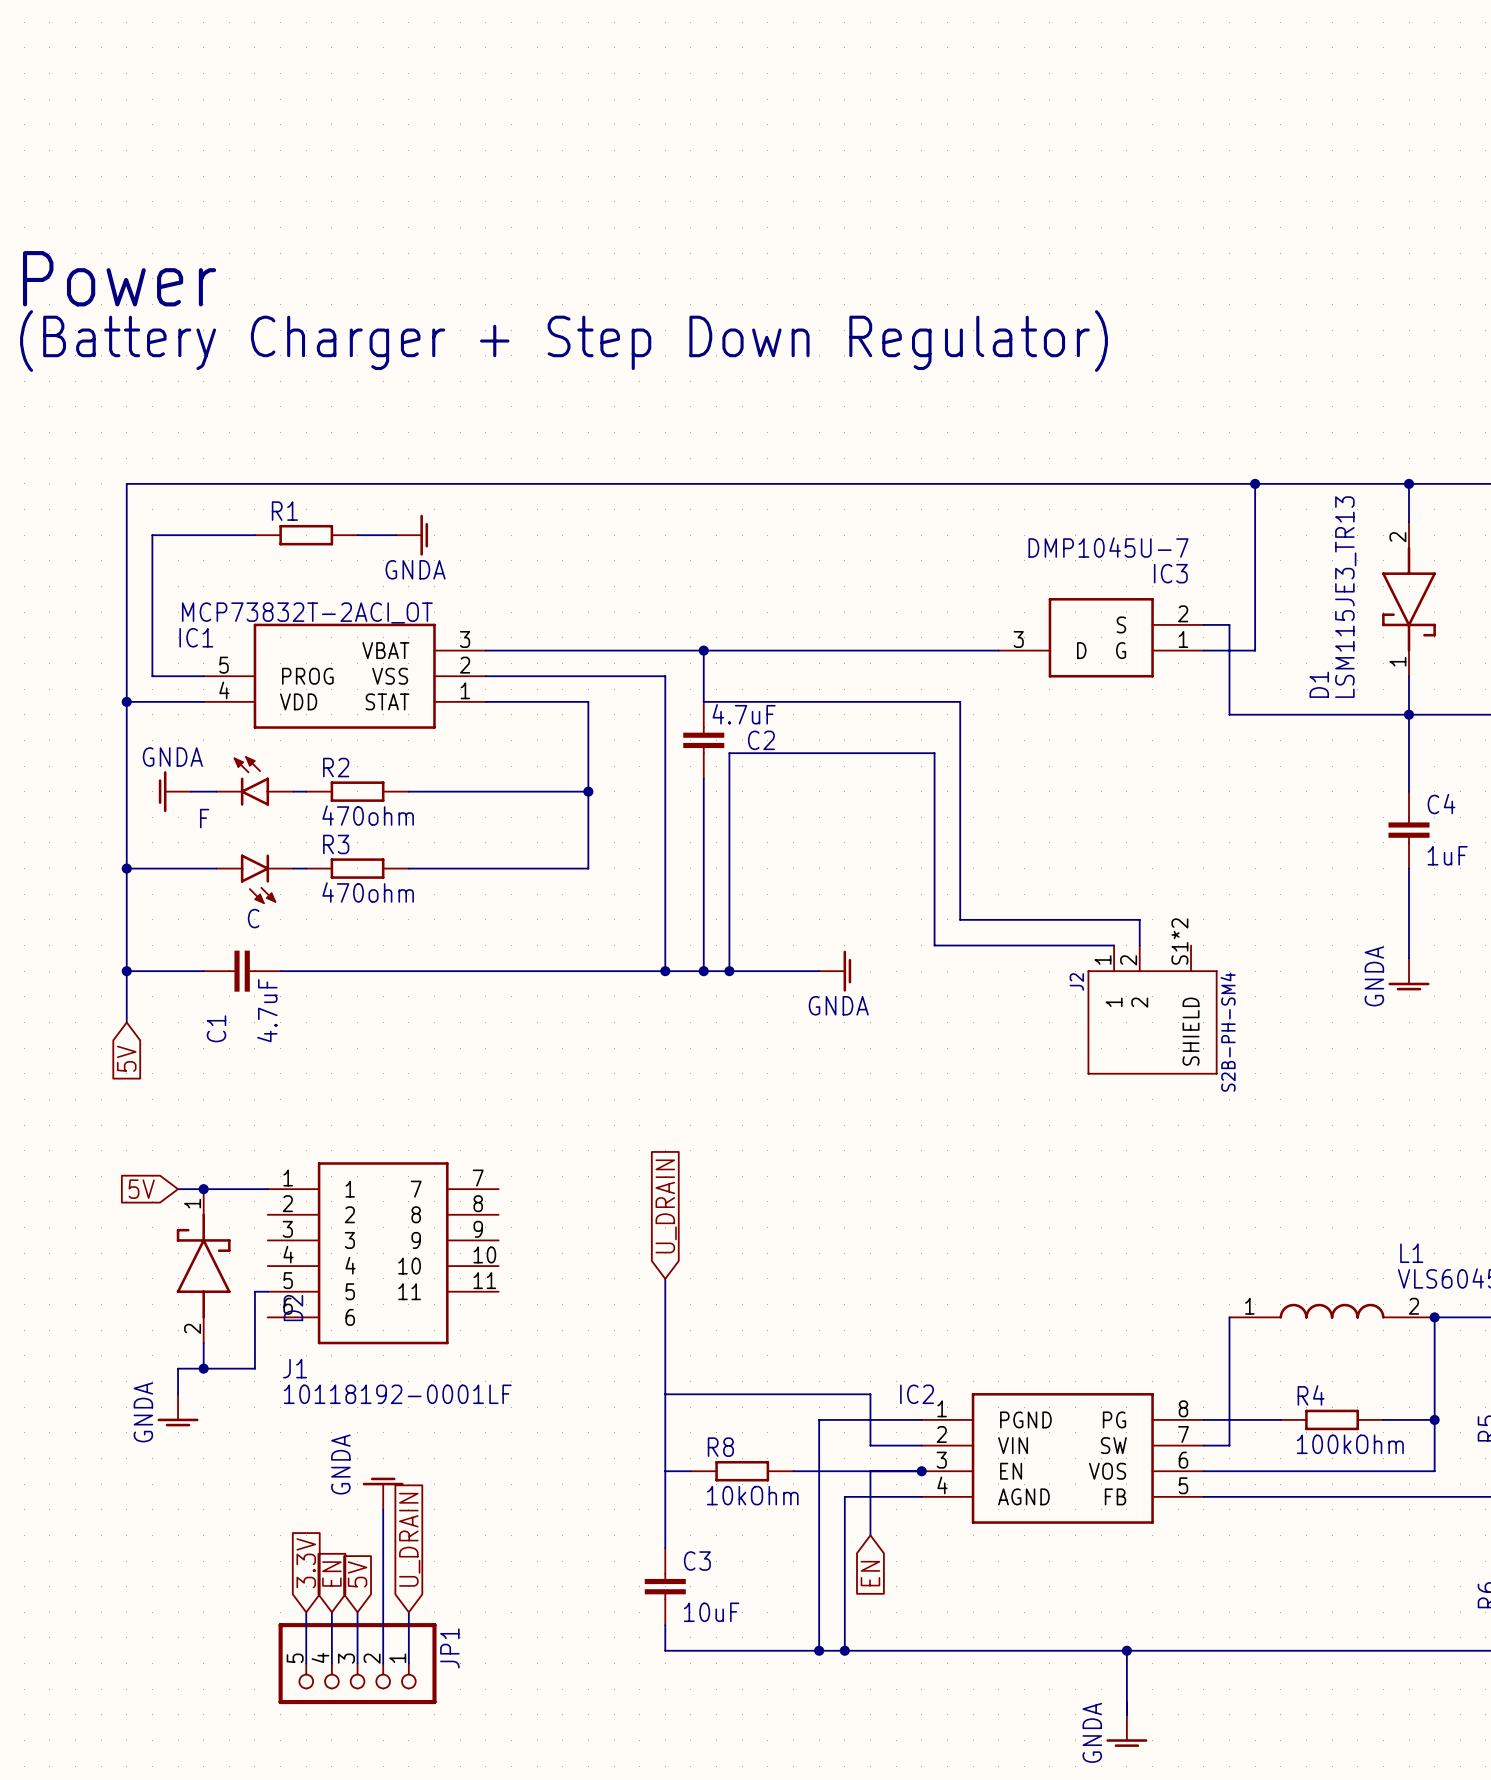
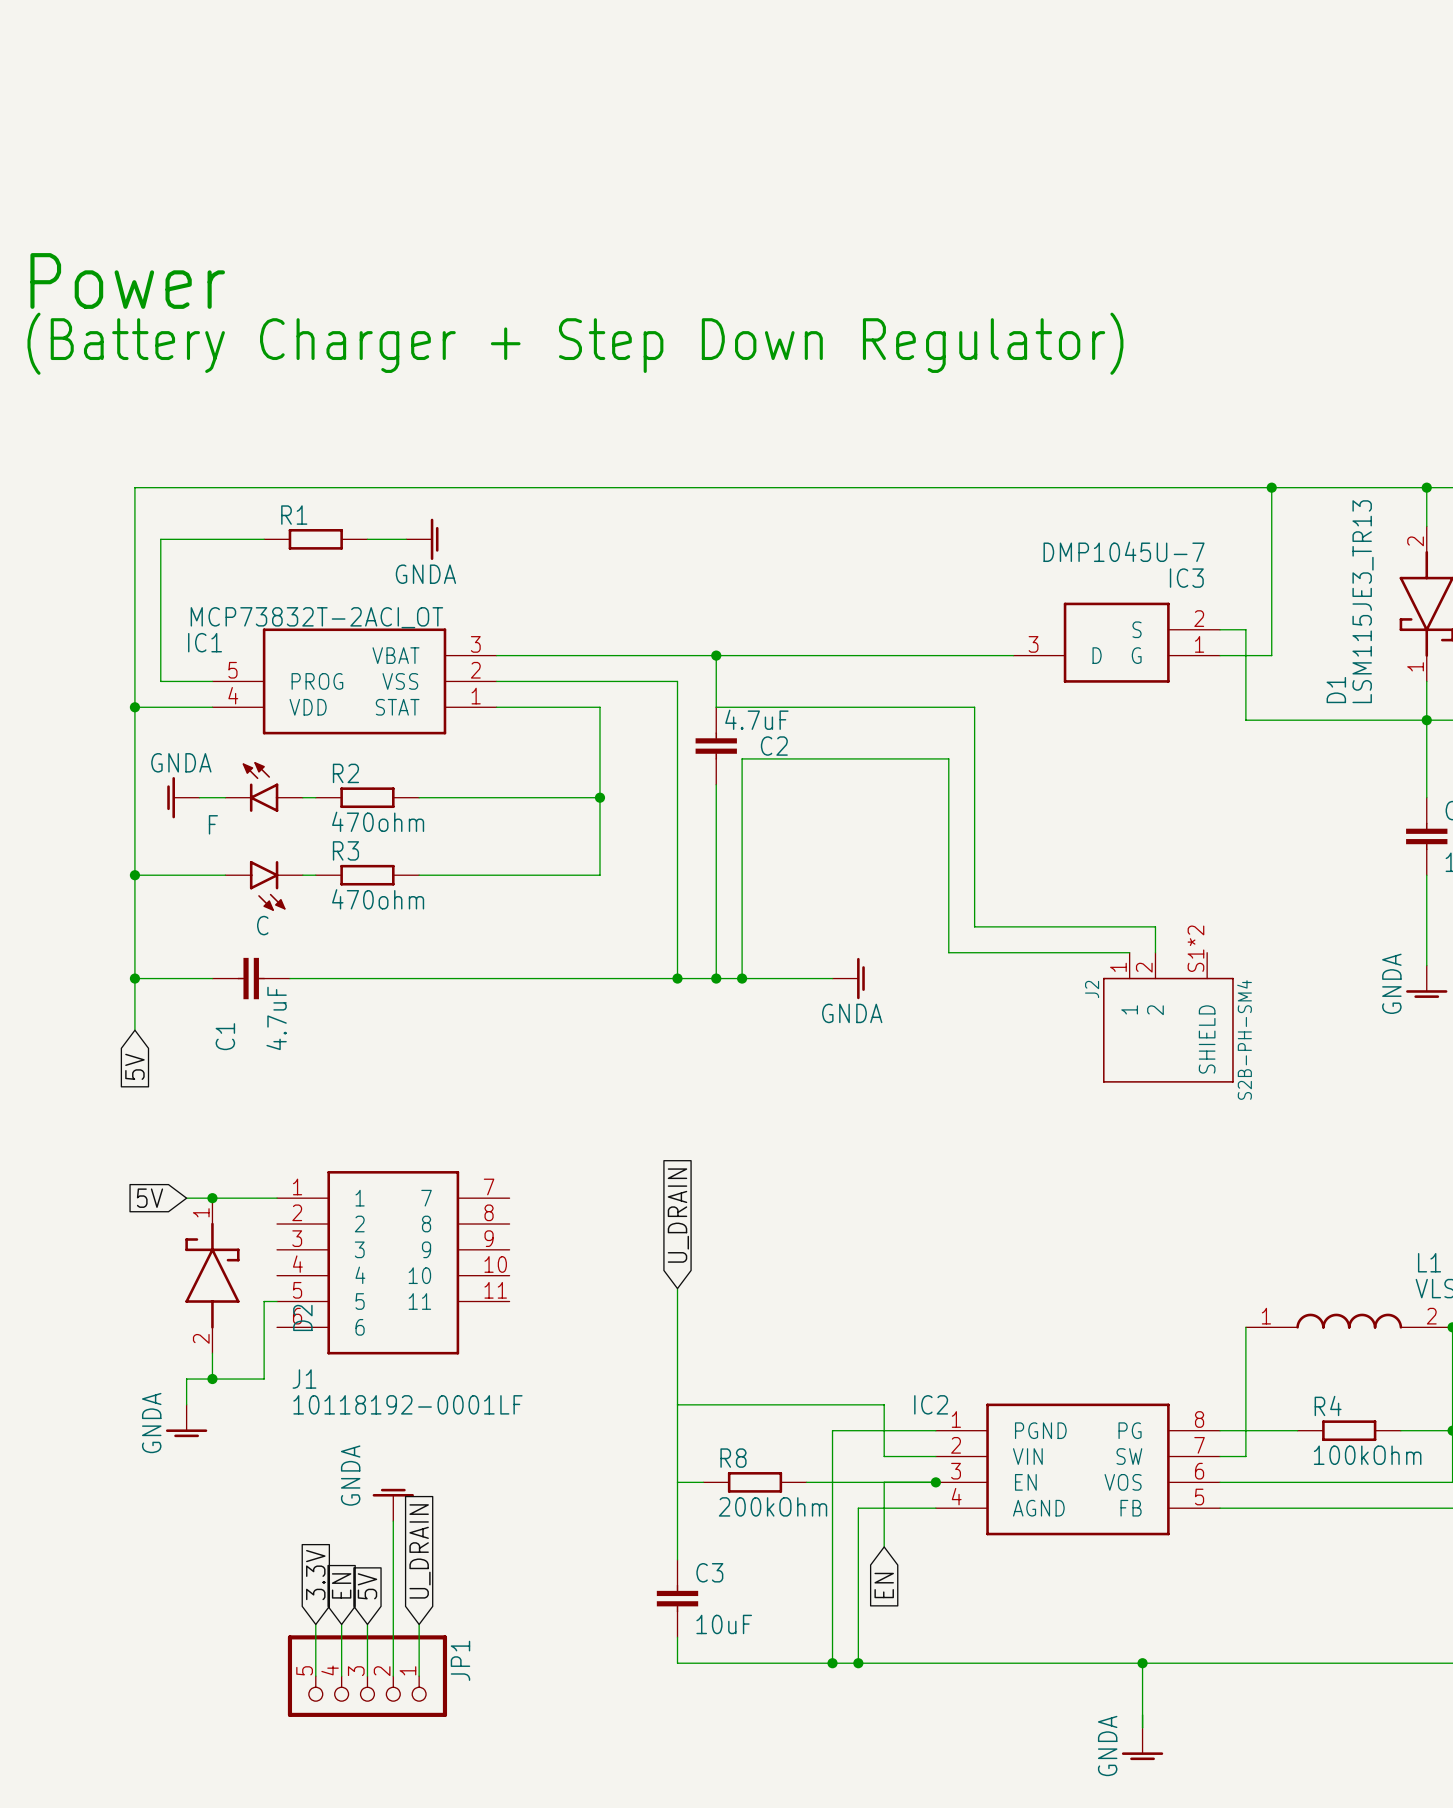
R8 value: 10kOhm (752, 1495) -> 200kOhm (773, 1506)

